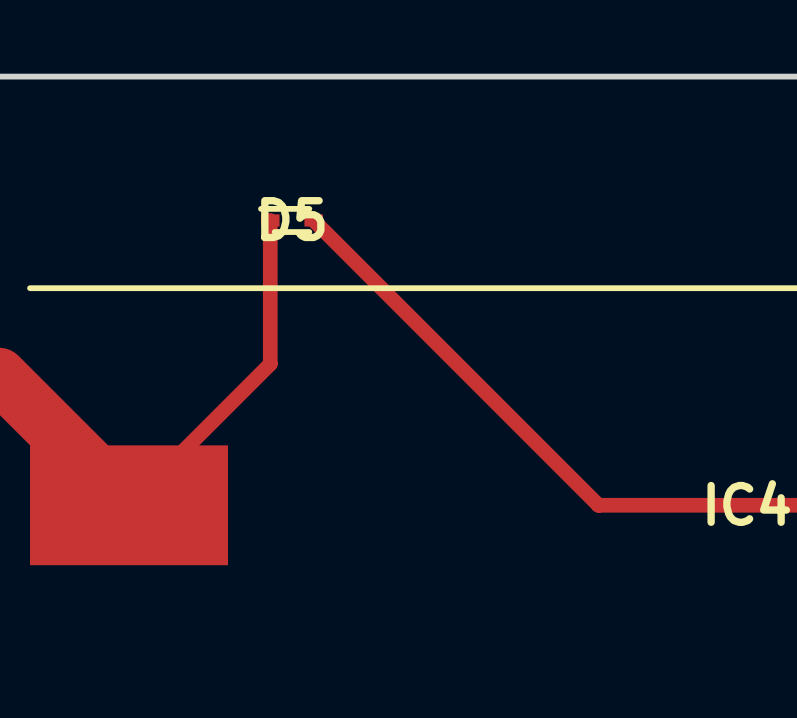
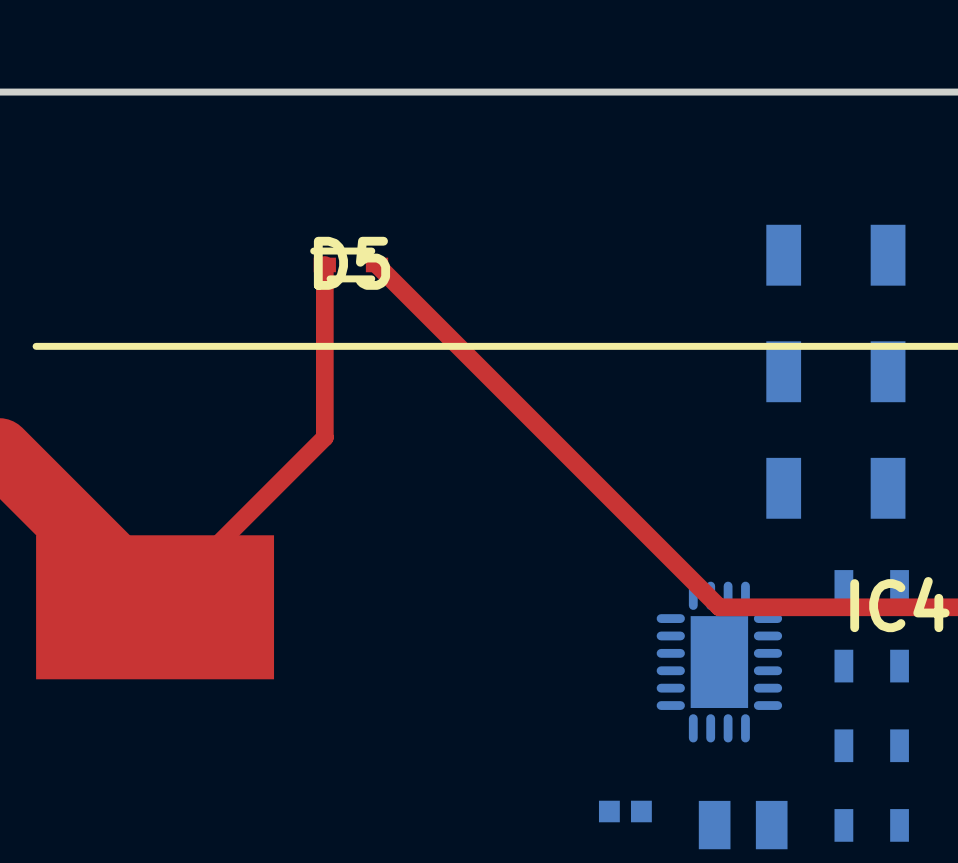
part: none -> (835, 255)
part: none -> (835, 371)
part: none -> (835, 488)
part: none -> (871, 586)
part: none -> (719, 662)
part: none -> (871, 666)
part: none -> (871, 745)
part: none -> (625, 811)
part: none -> (743, 825)
part: none -> (871, 825)

